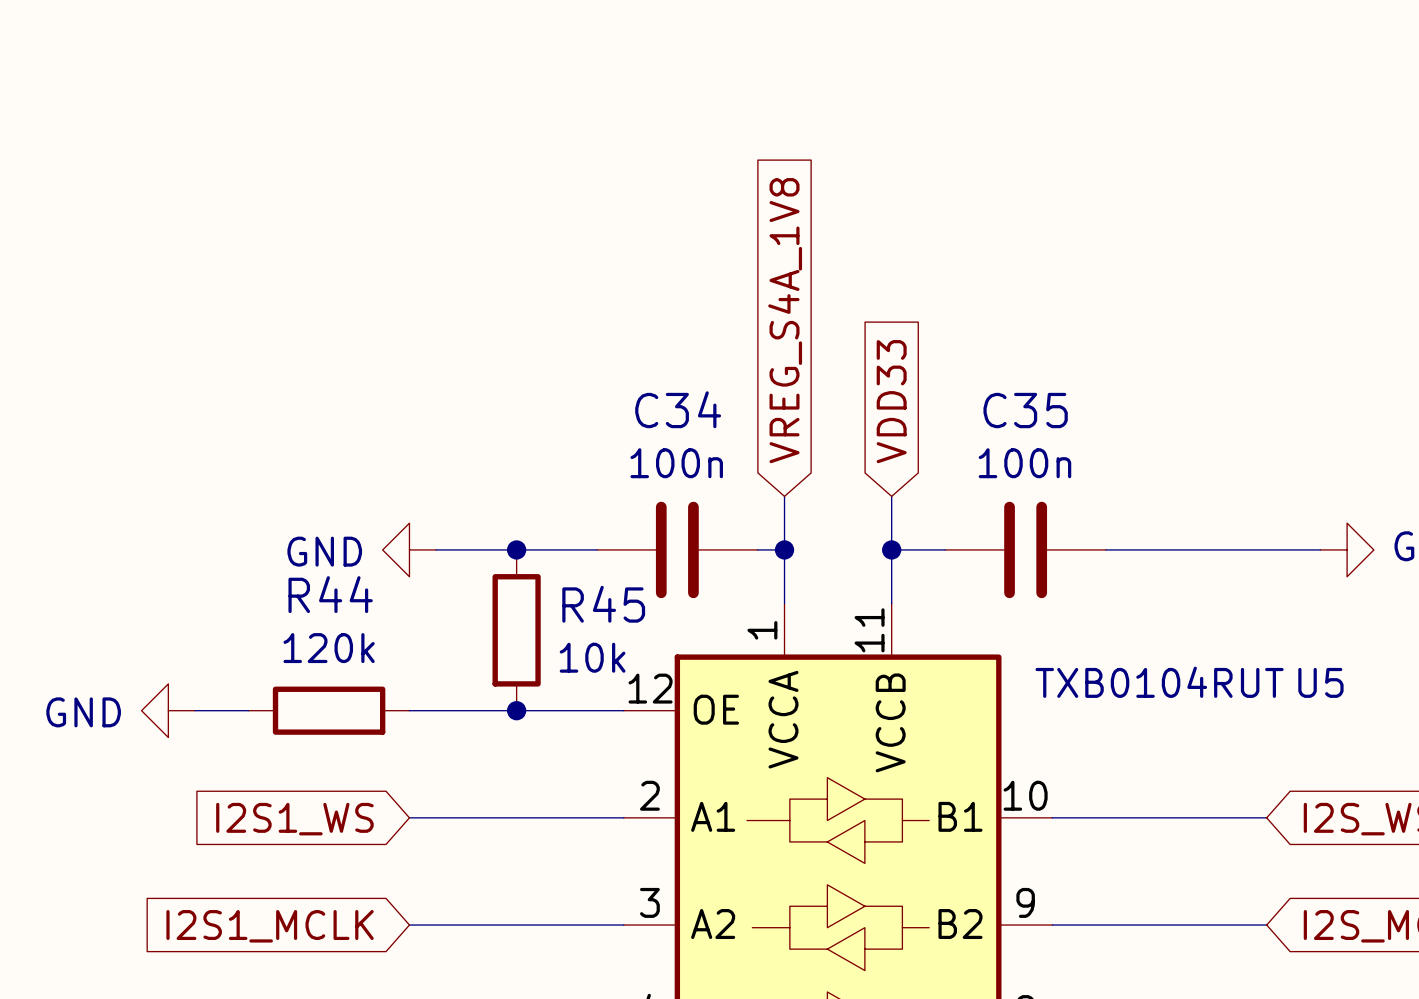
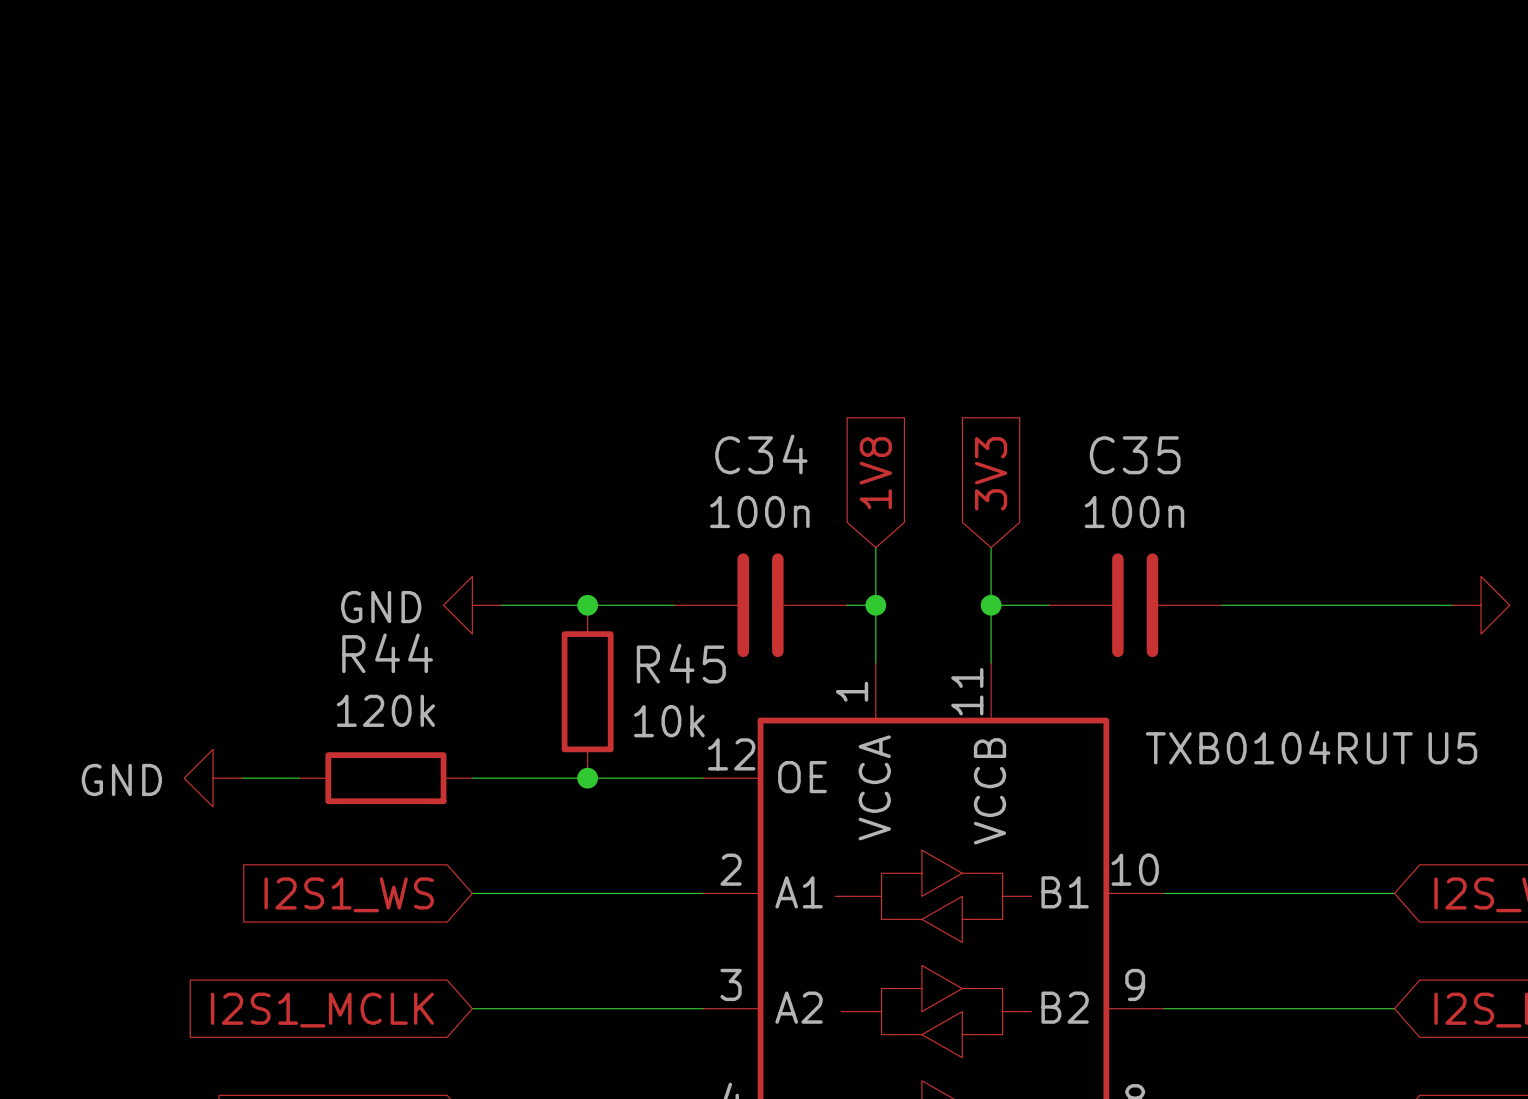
global label: VREG_S4A_1V8 (785, 320) -> 1V8 (875, 473)
global label: VDD33 (891, 401) -> 3V3 (991, 473)

